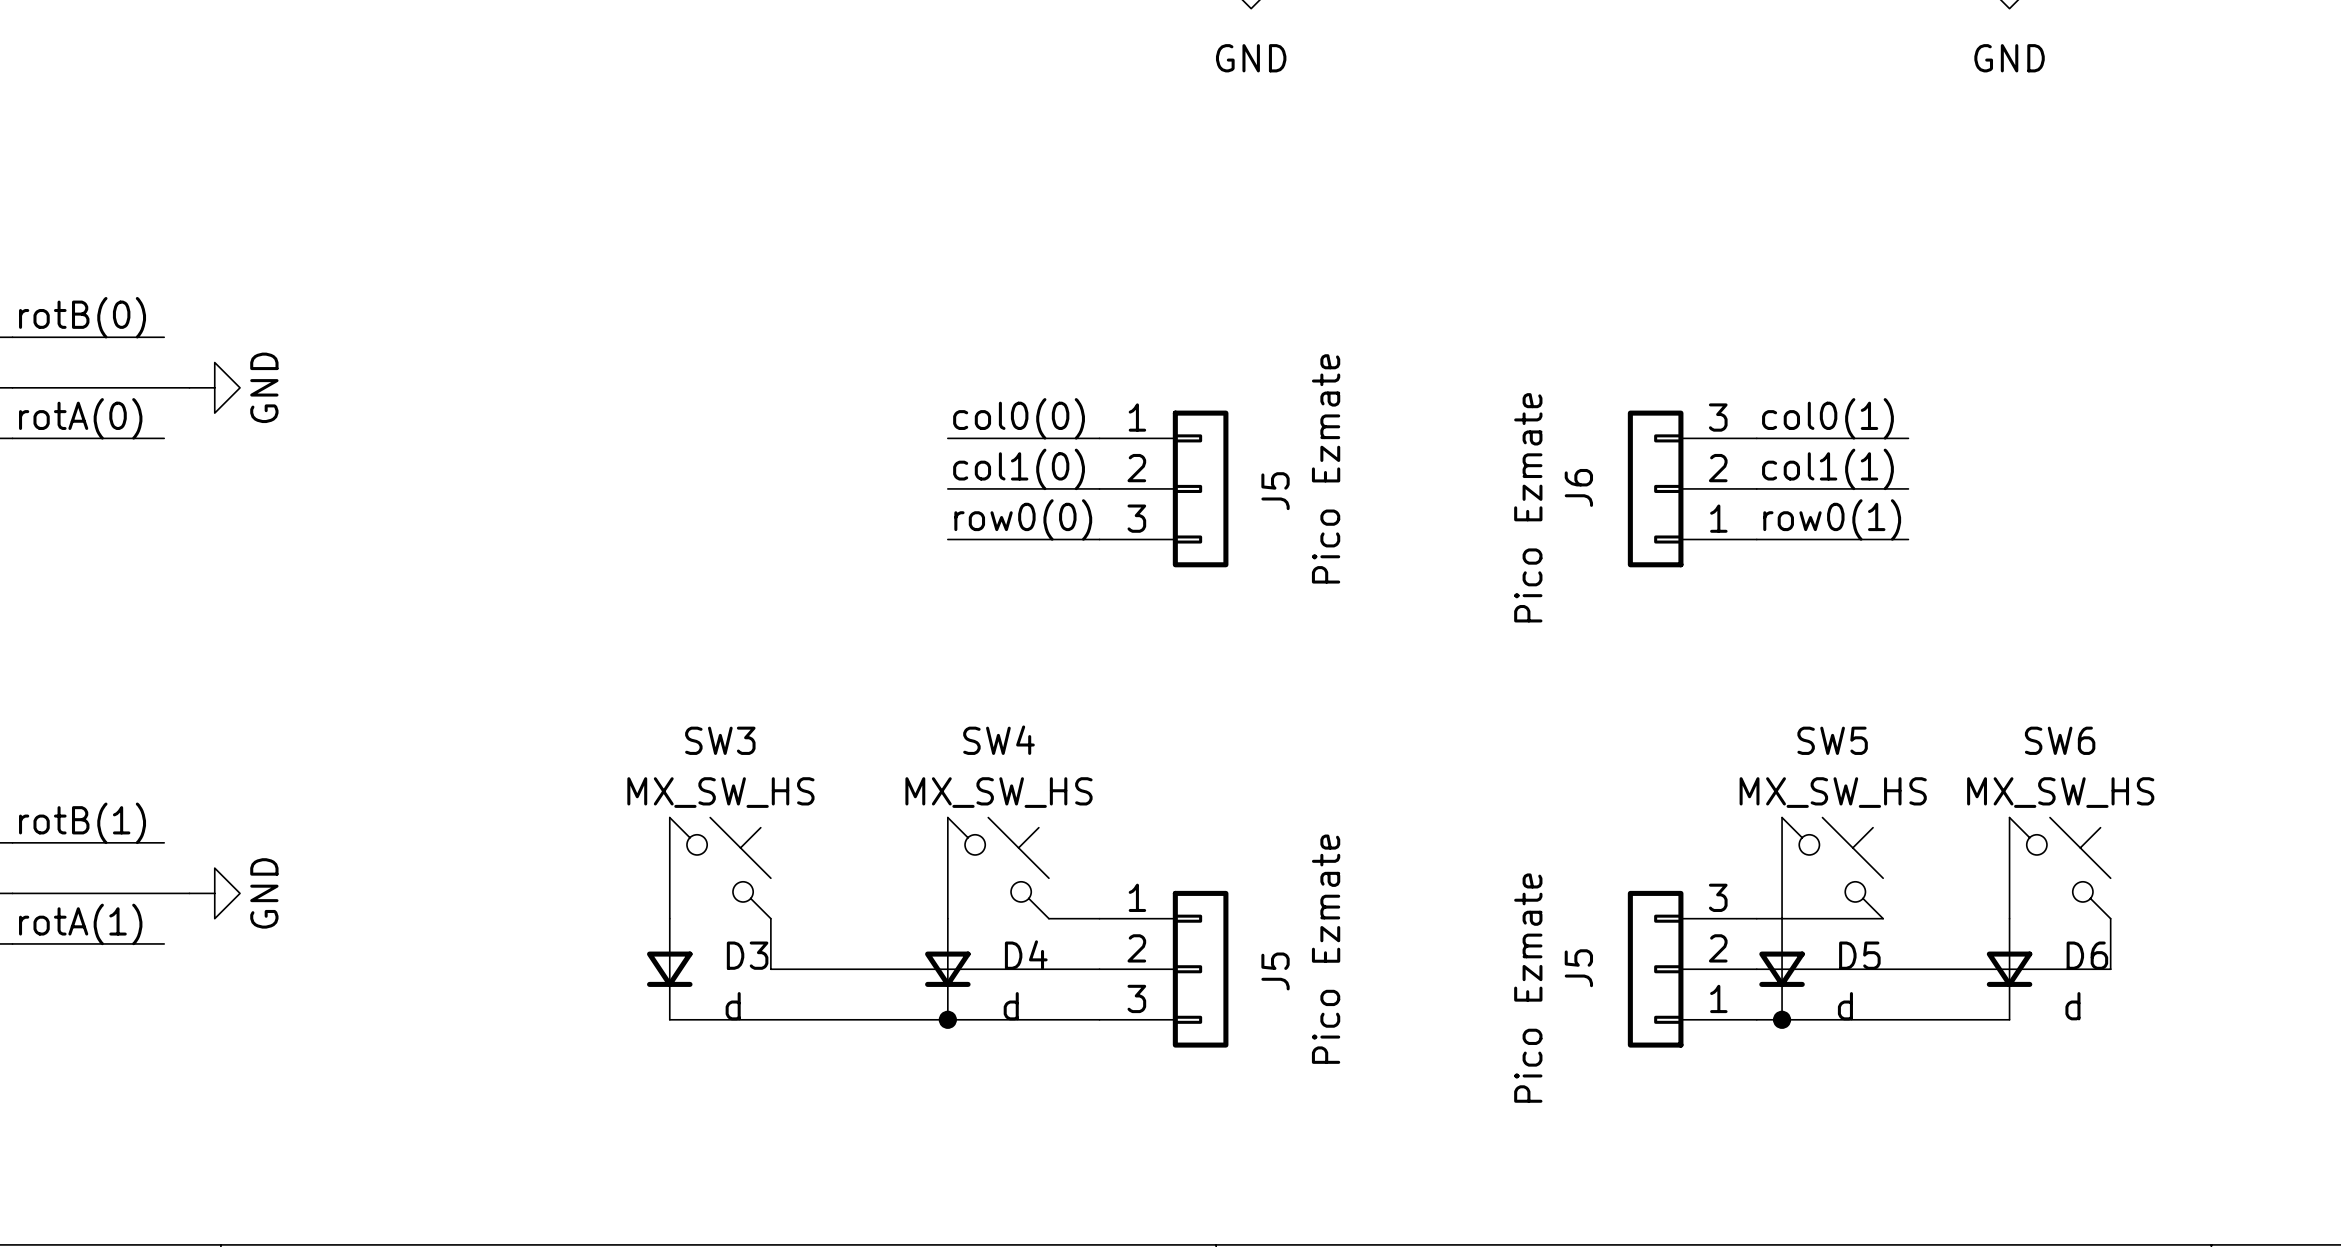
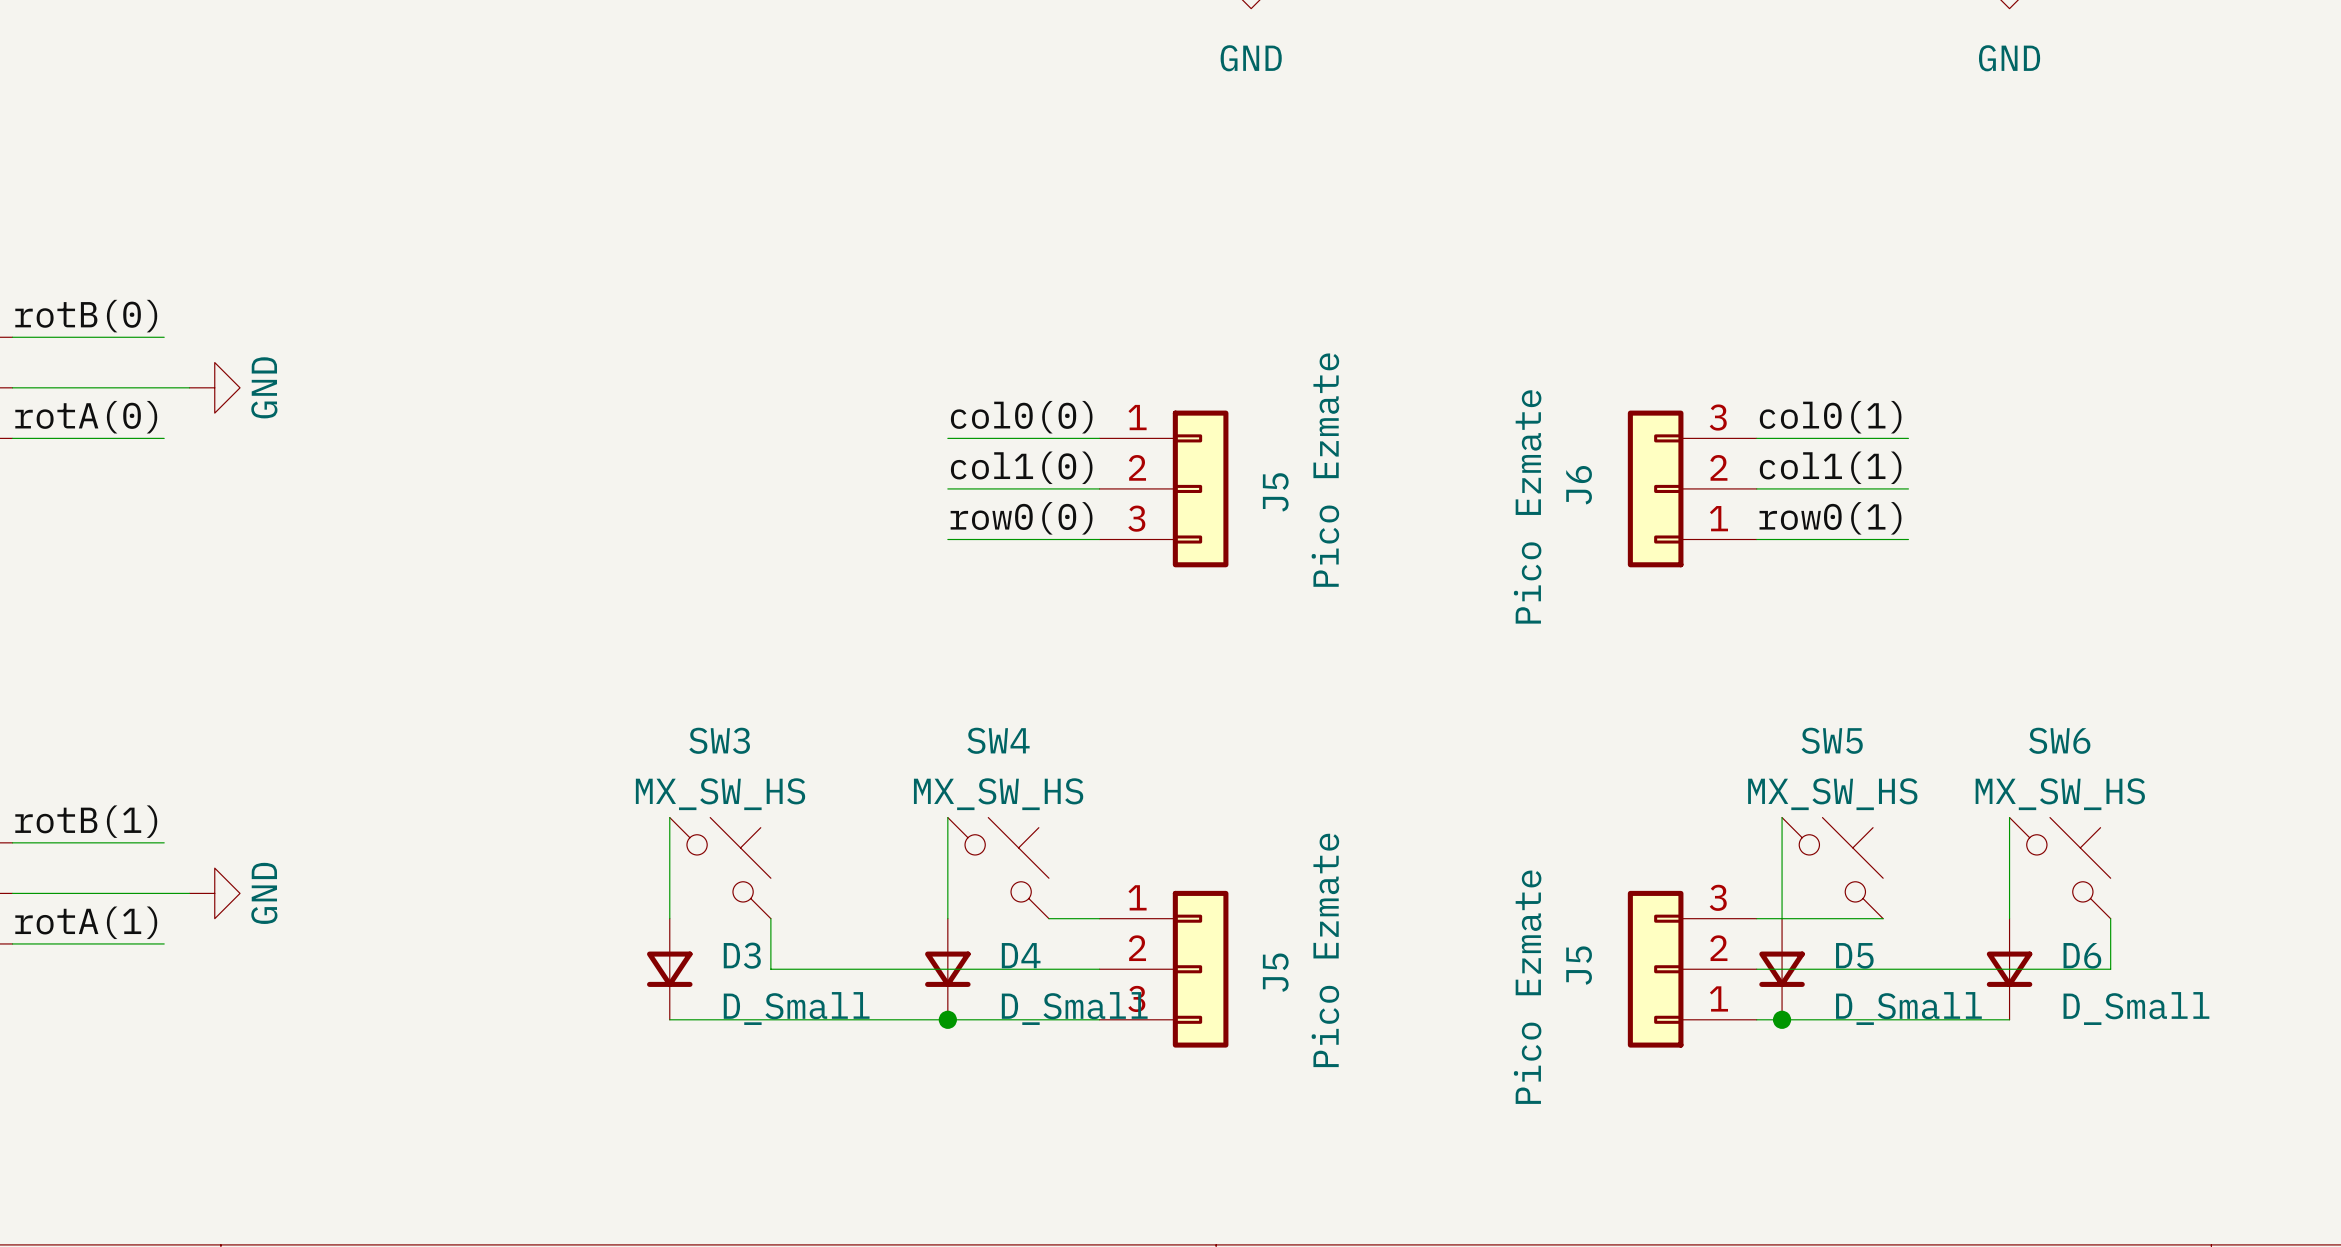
D3 value: d (733, 1006) -> D_Small (796, 1008)
D4 value: d (1011, 1006) -> D_Small (1074, 1008)
D5 value: d (1845, 1006) -> D_Small (1908, 1008)
D6 value: d (2072, 1006) -> D_Small (2136, 1008)

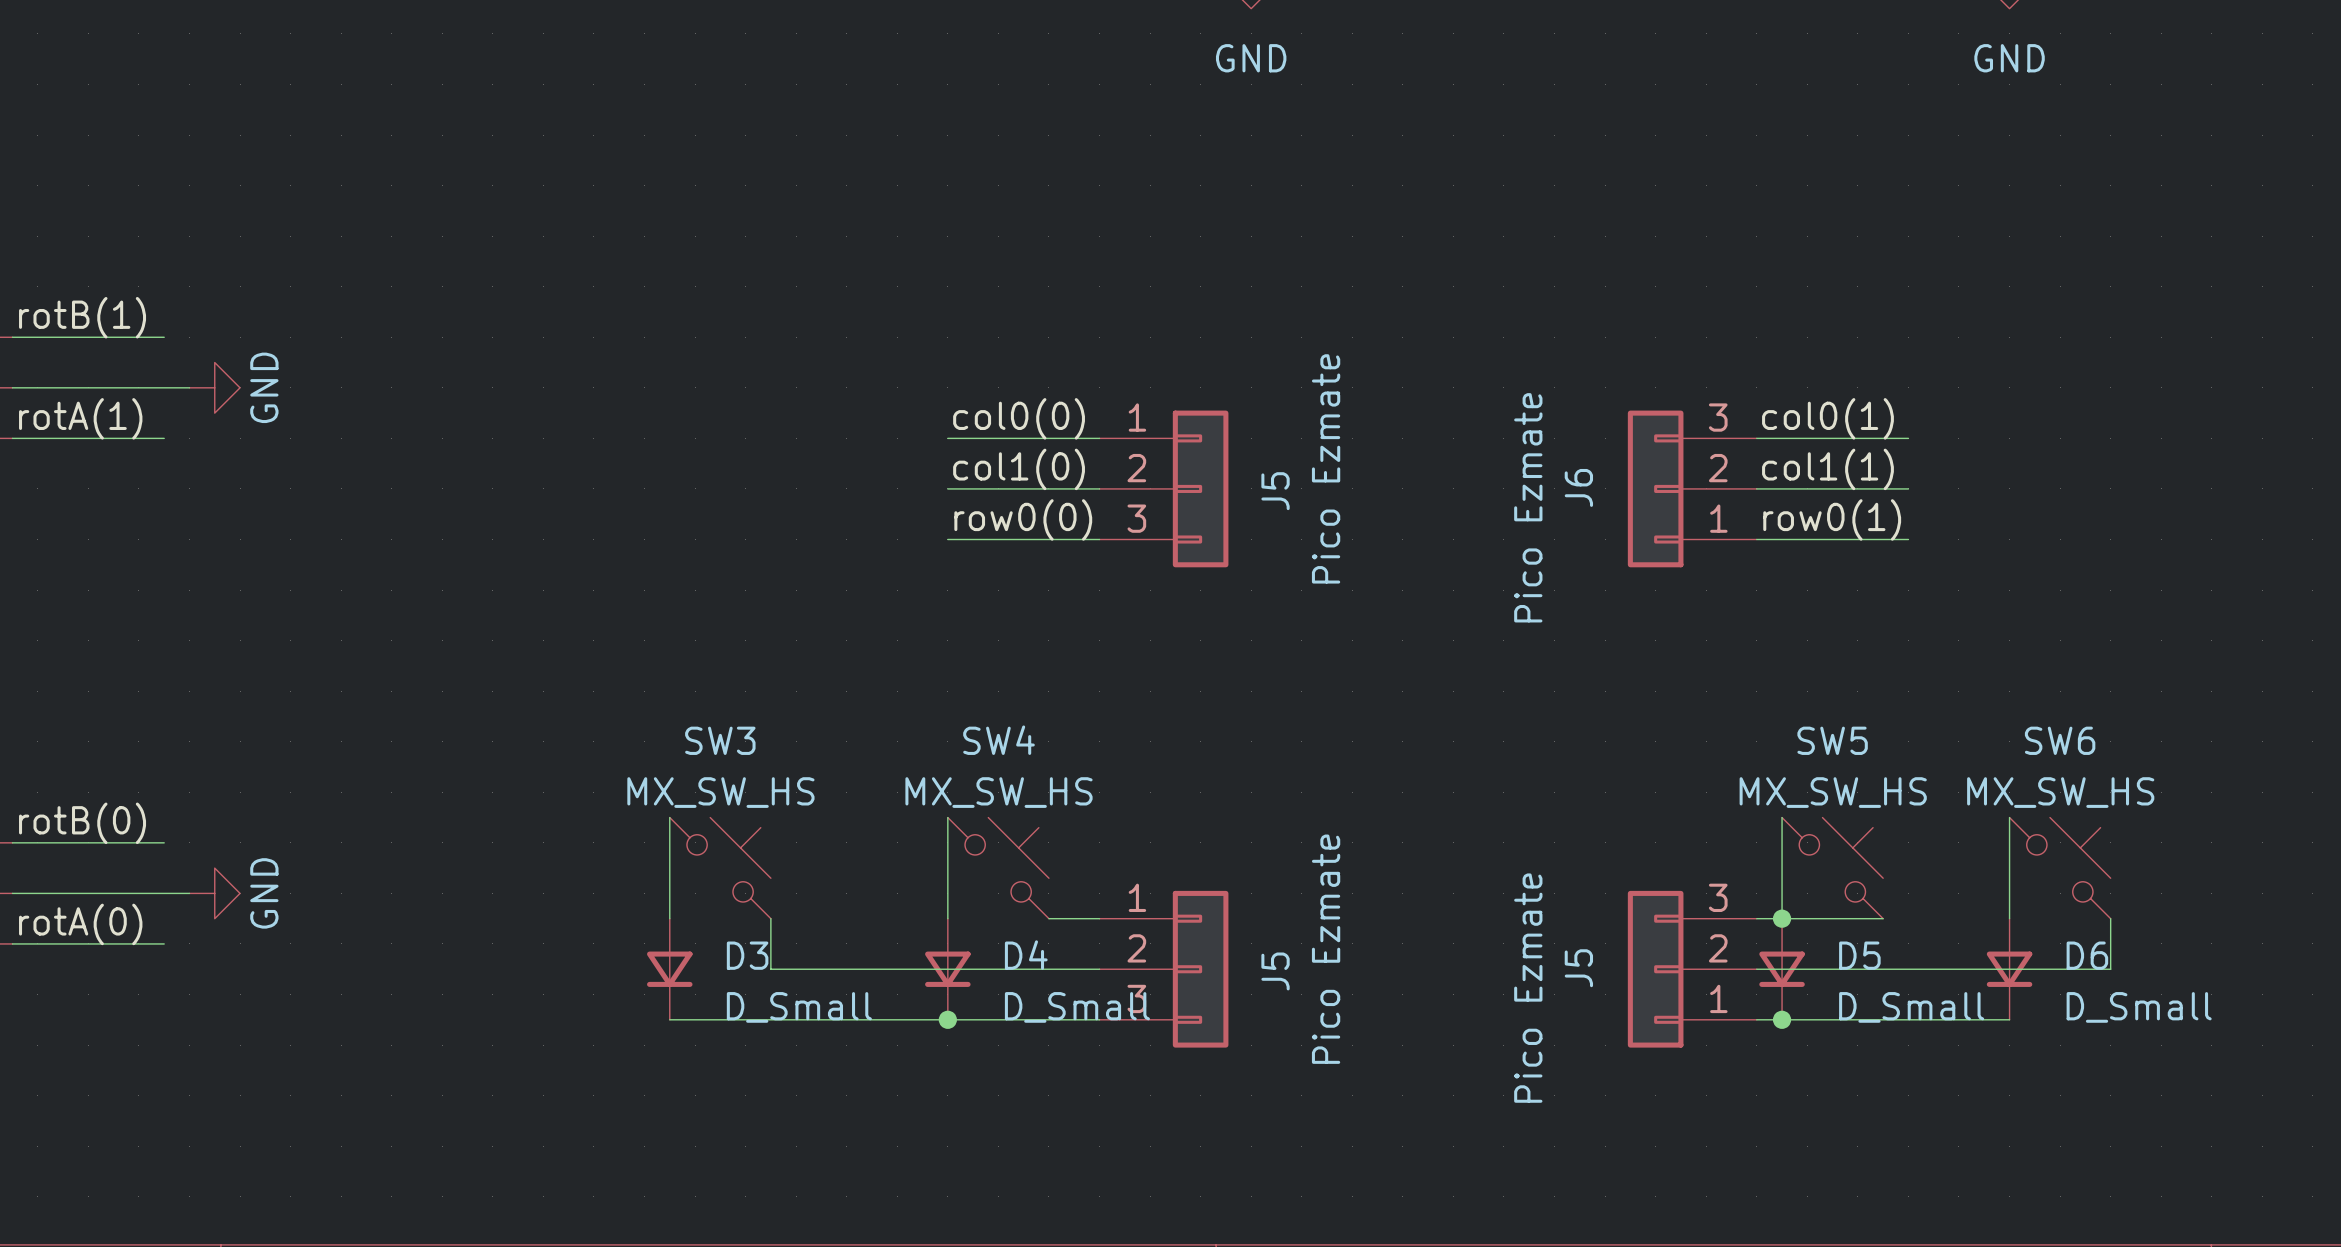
label: rotB(0) (86, 316) -> rotB(1) (82, 317)
label: rotA(0) (86, 417) -> rotA(1) (80, 418)
label: rotB(1) (86, 821) -> rotB(0) (82, 823)
junction: none -> (1782, 918)
label: rotA(1) (86, 922) -> rotA(0) (80, 924)

